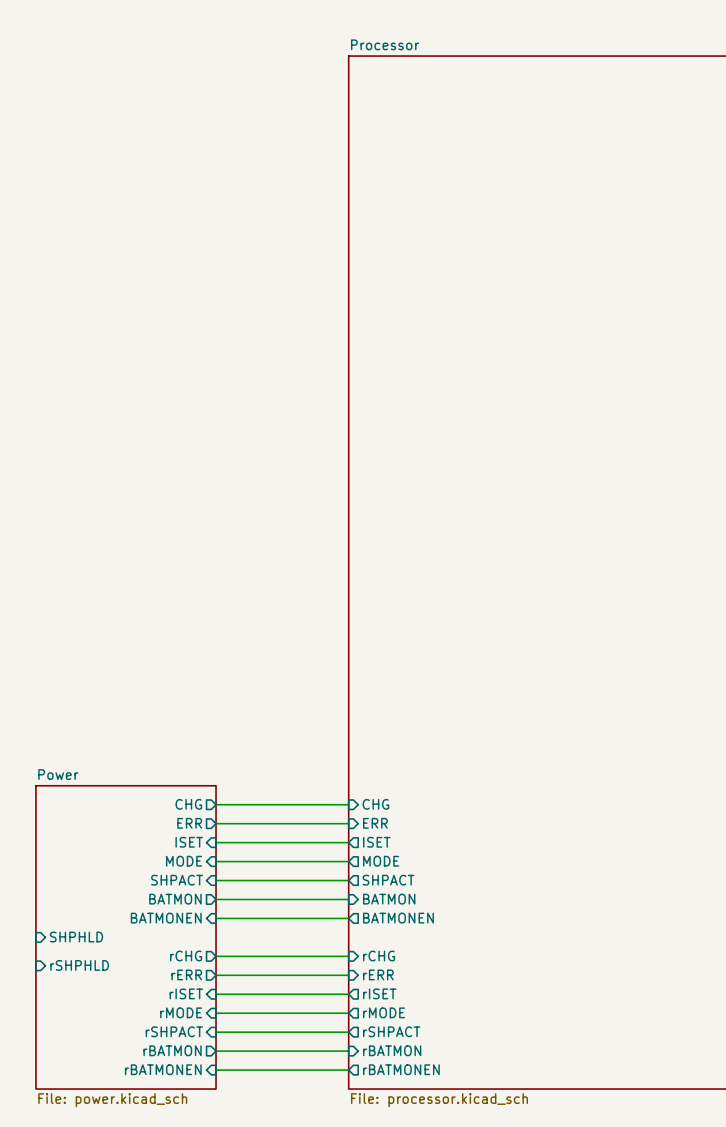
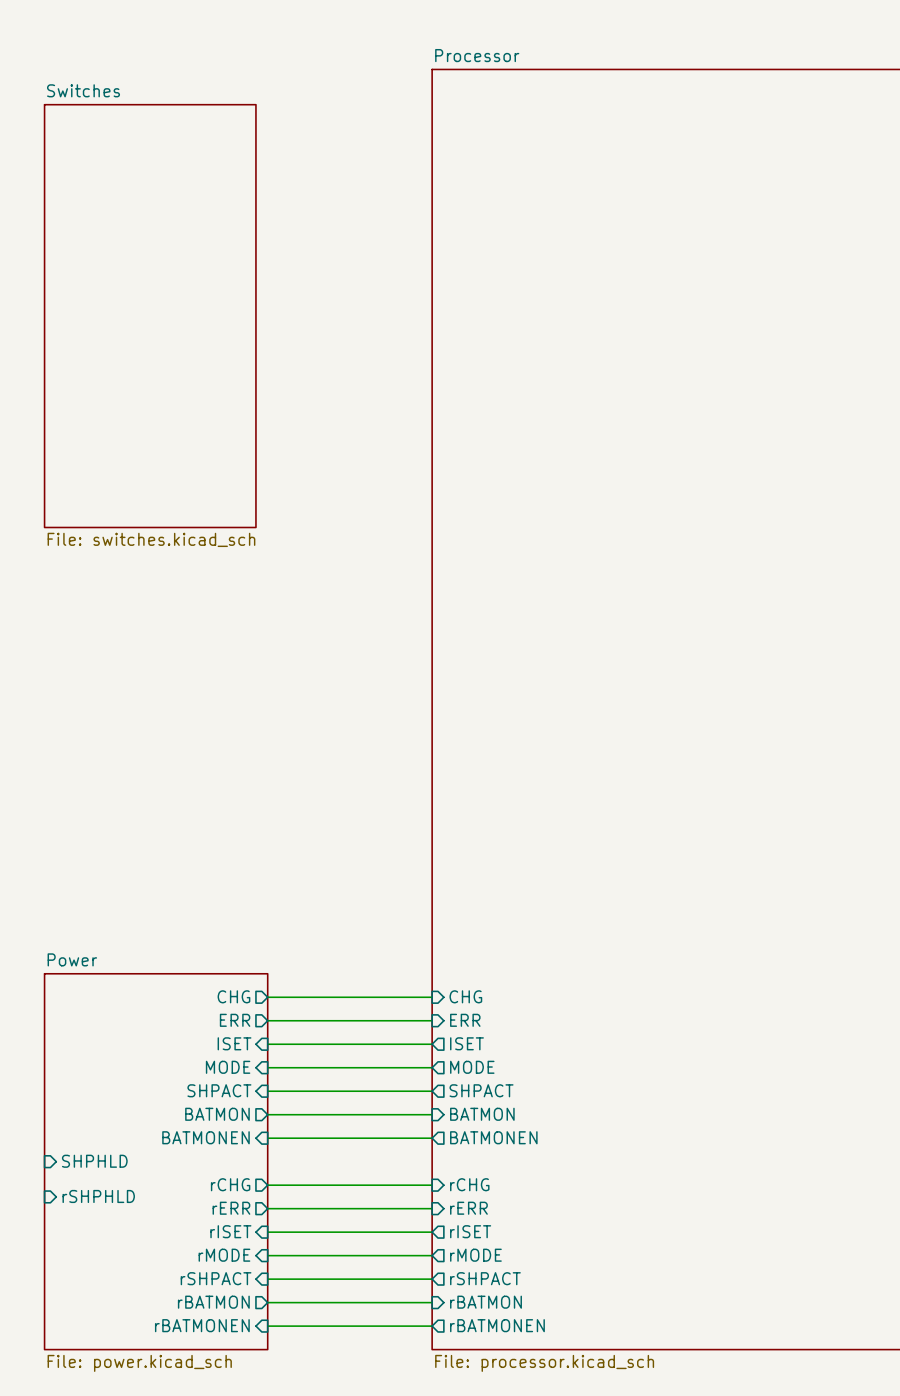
sheet Switches: none -> File: switches.kicad_sch (150, 316)

